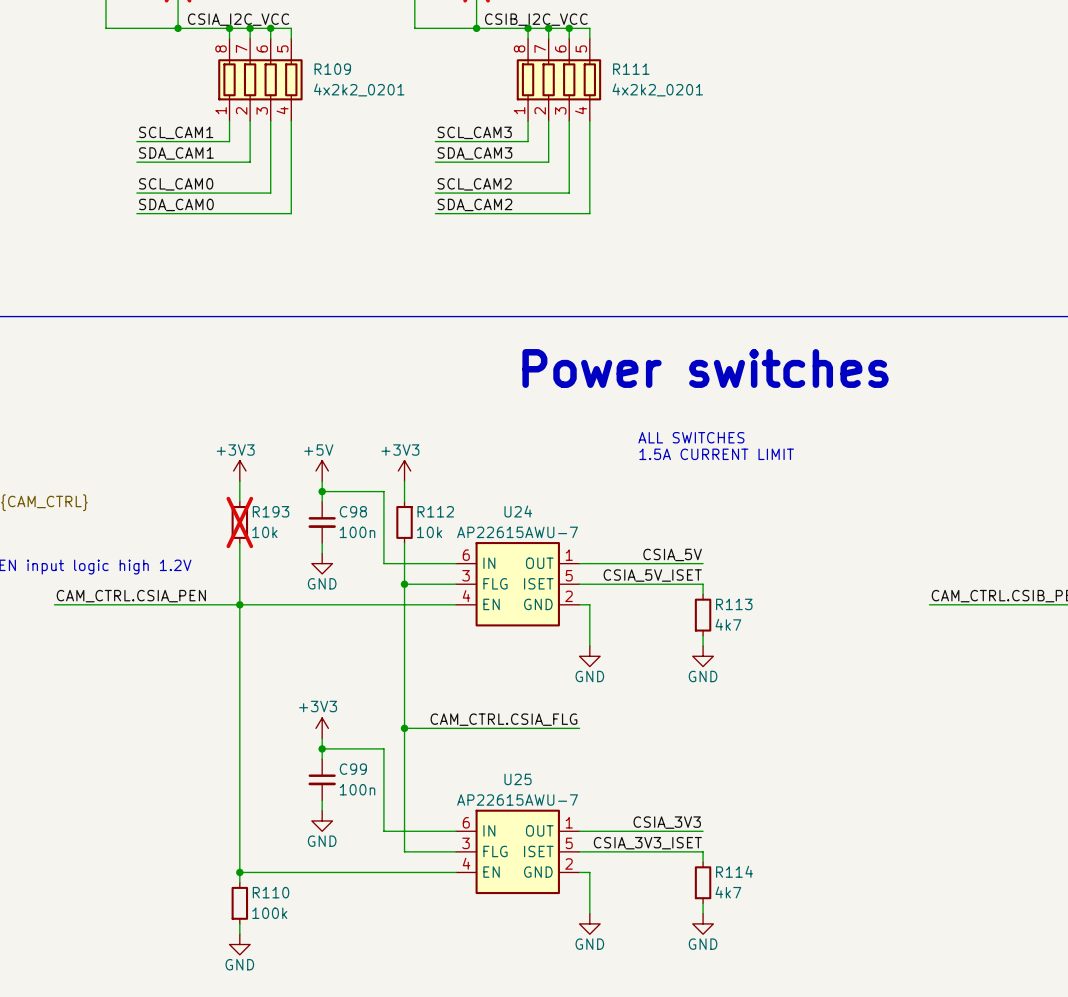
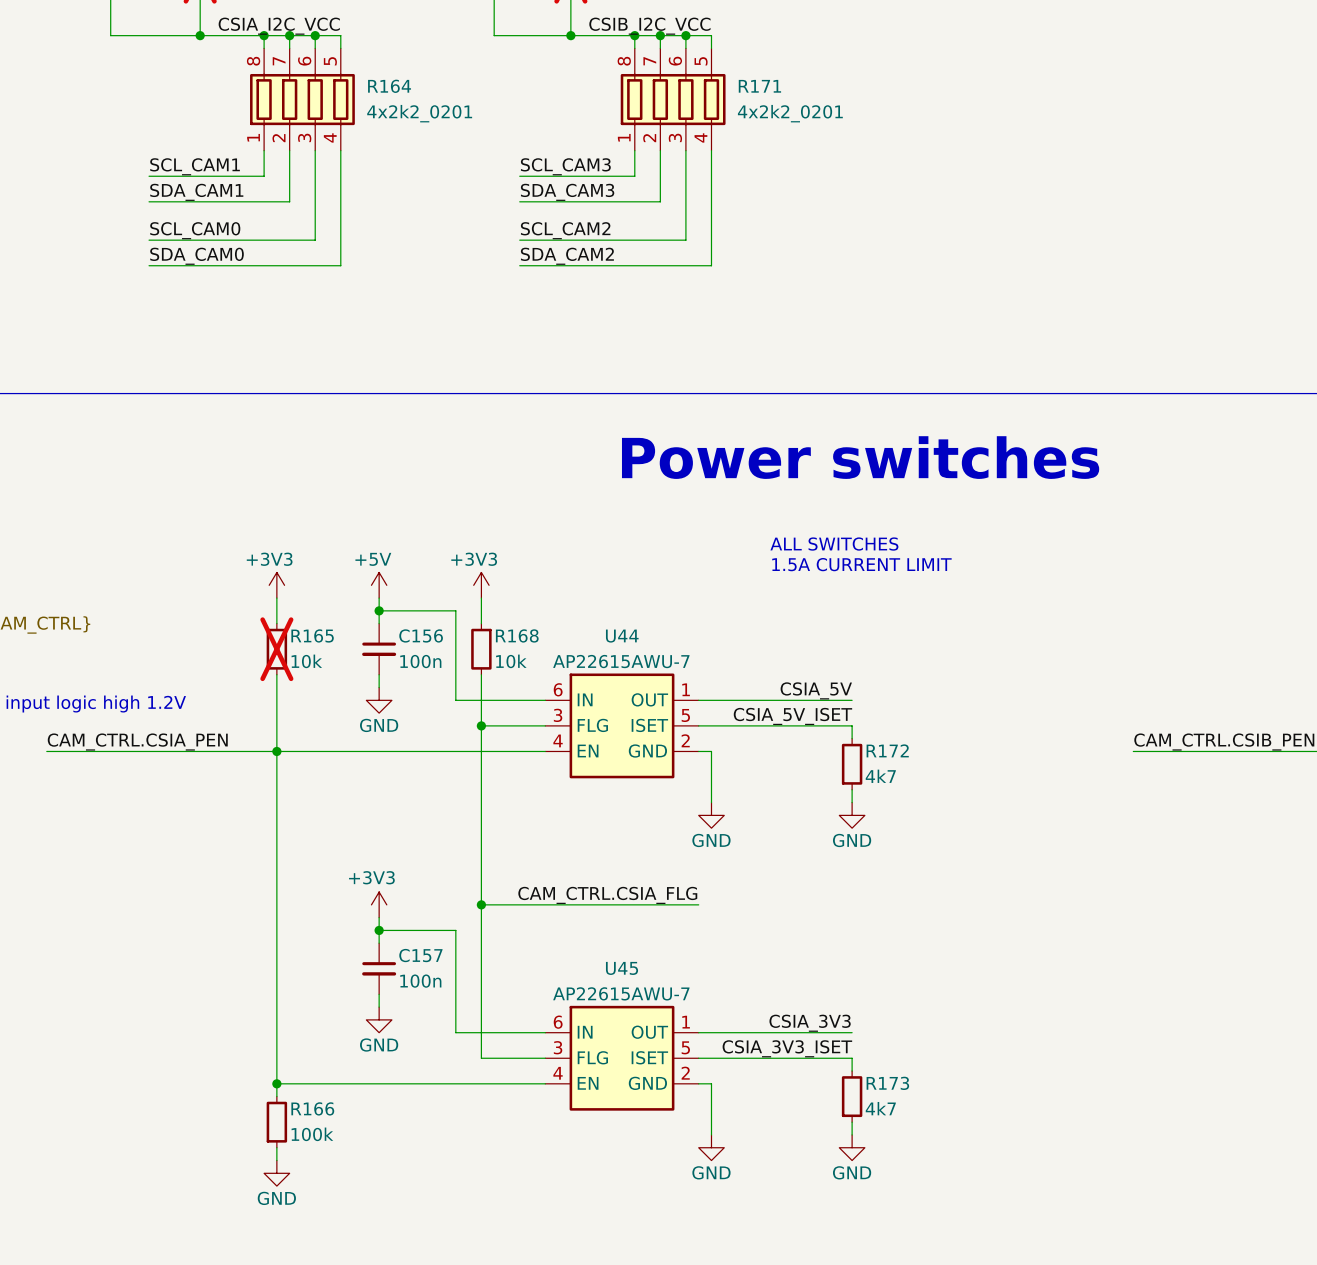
R109 name: R109 (332, 69) -> R164 (389, 86)
R111 name: R111 (631, 69) -> R171 (759, 86)
R193 name: R193 (271, 511) -> R165 (312, 635)
C98 name: C98 (353, 511) -> C156 (421, 635)
R112 name: R112 (435, 511) -> R168 (517, 635)
U24 name: U24 (518, 511) -> U44 (622, 636)
R113 name: R113 (734, 604) -> R172 (887, 750)
C99 name: C99 (353, 769) -> C157 (420, 955)
U25 name: U25 (518, 779) -> U45 (622, 968)
R114 name: R114 (734, 871) -> R173 (887, 1083)
R110 name: R110 (271, 892) -> R166 (312, 1108)

